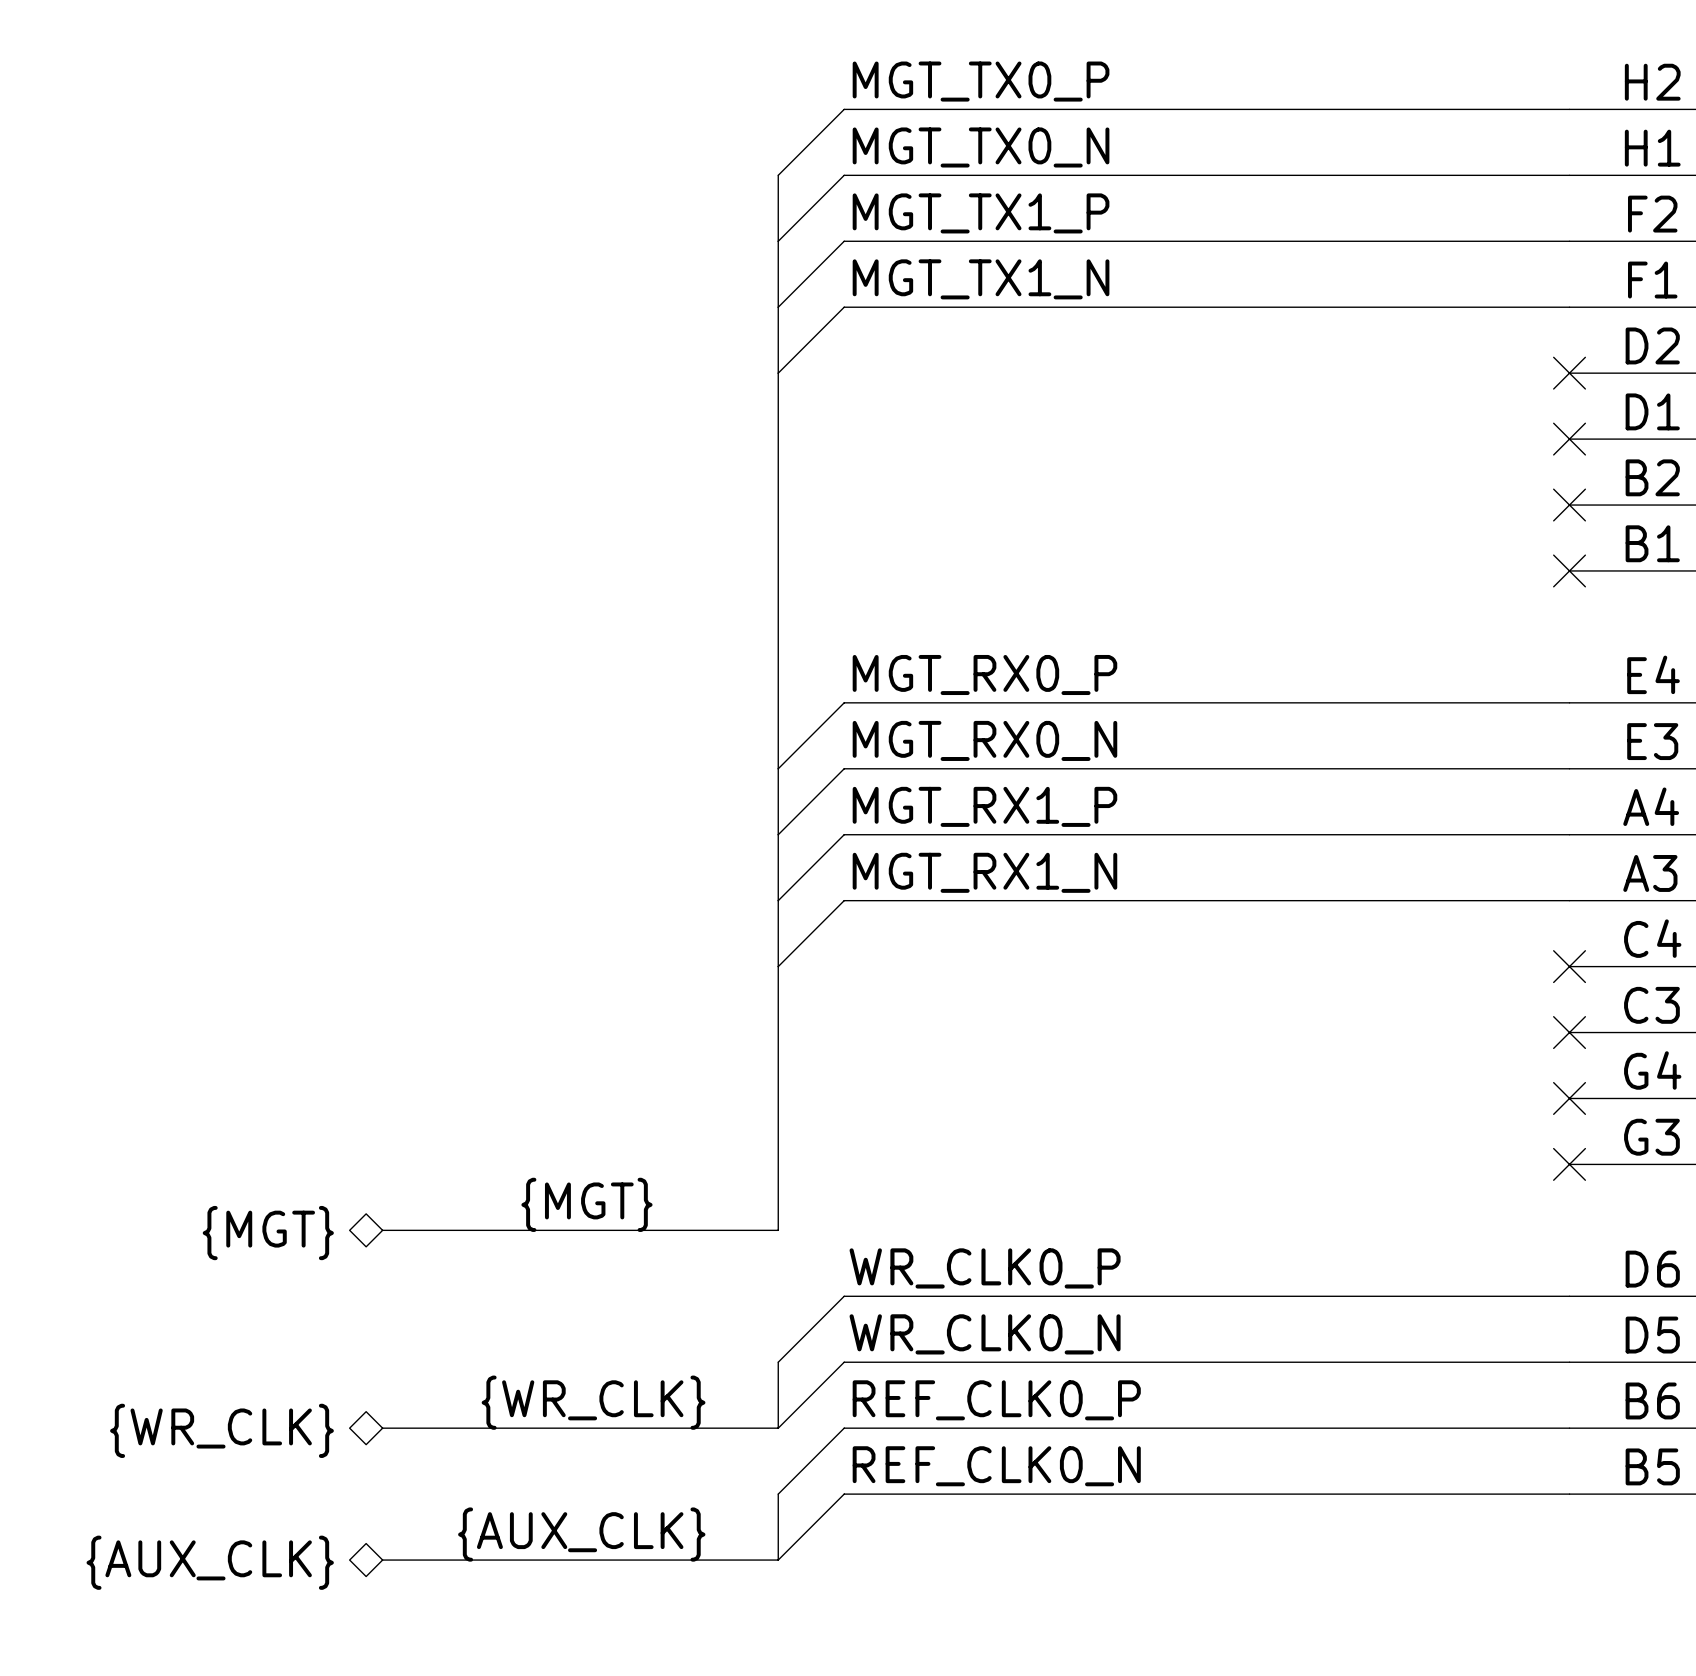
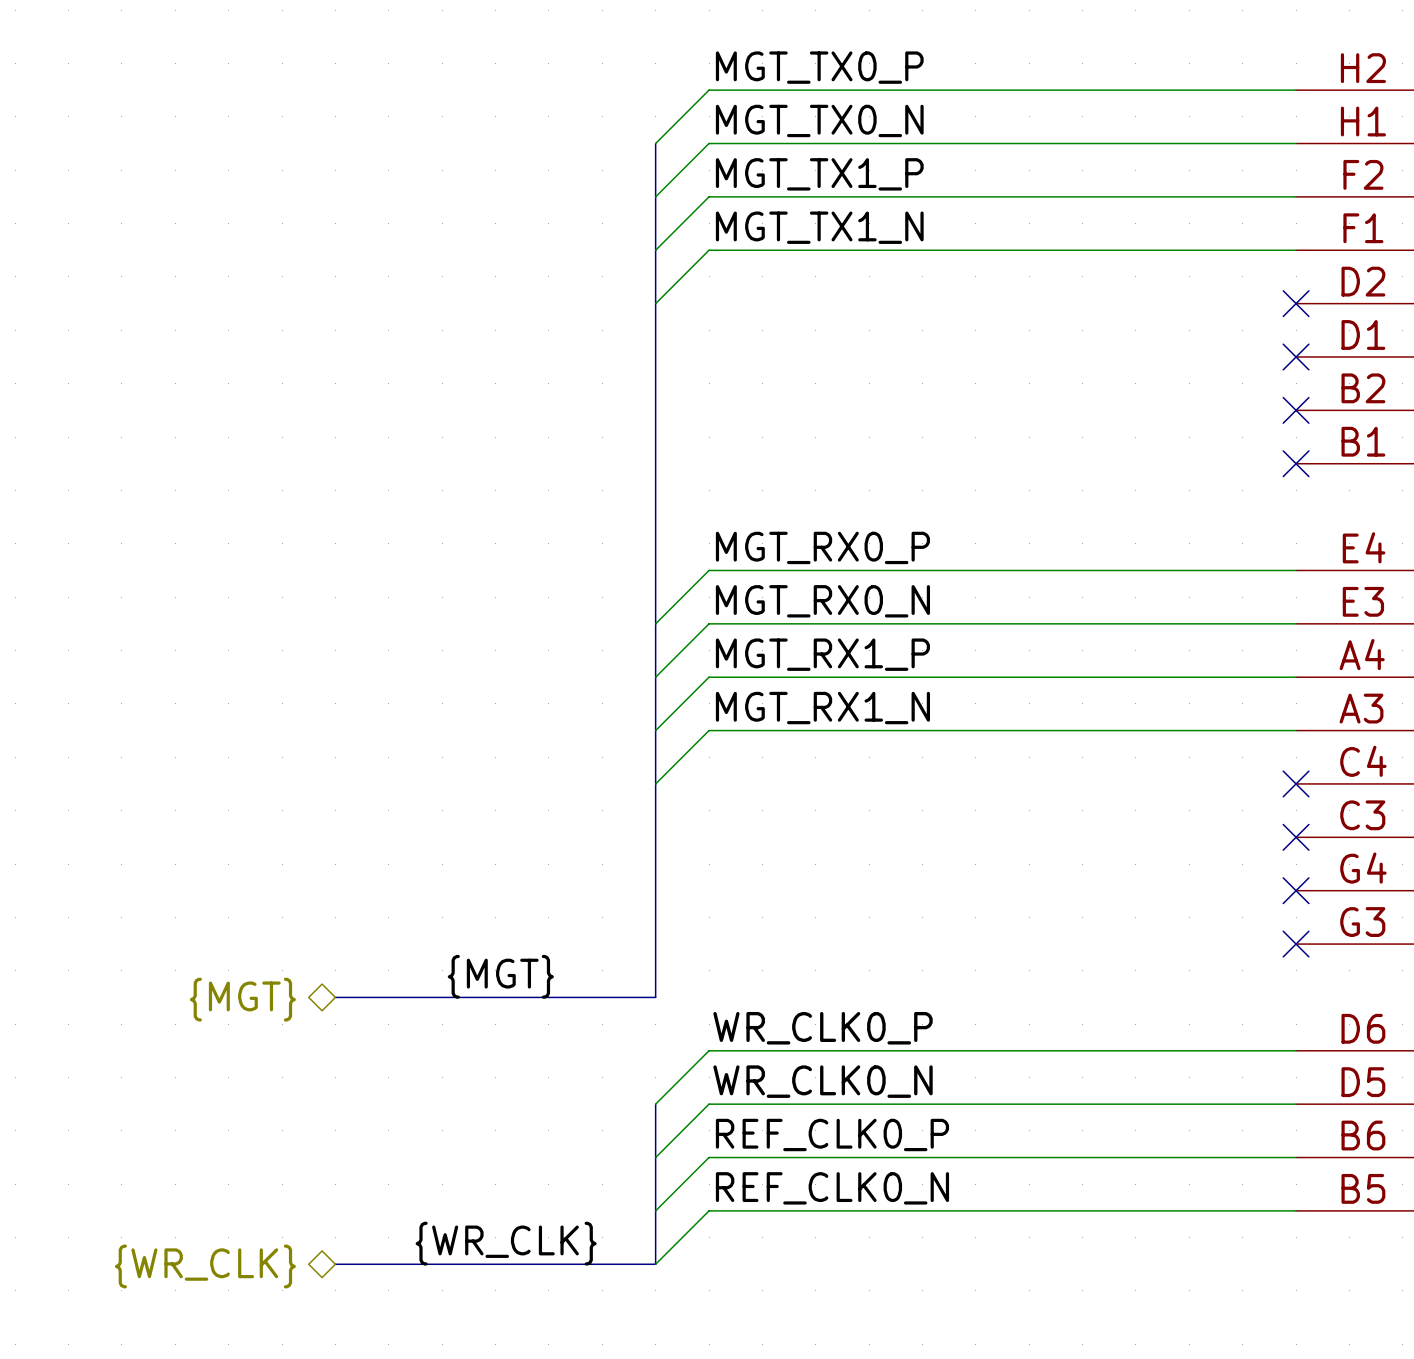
label: {WR_CLK} (593, 1402) -> none
bus: (382, 1428) (778, 1428) -> (655, 1210) (655, 1157)
hierarchical label: {WR_CLK} (221, 1430) -> none
label: {AUX_CLK} (581, 1534) -> {WR_CLK} (506, 1243)
hierarchical label: {AUX_CLK} (210, 1562) -> {WR_CLK} (205, 1266)

